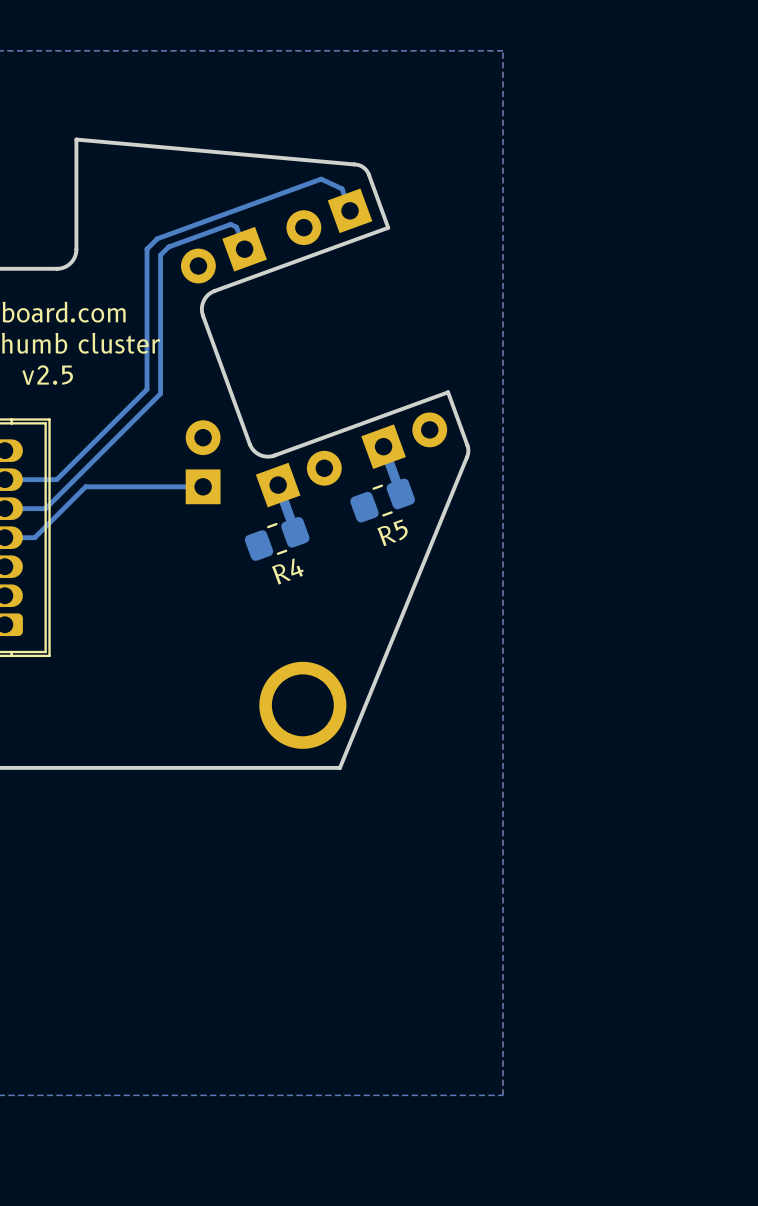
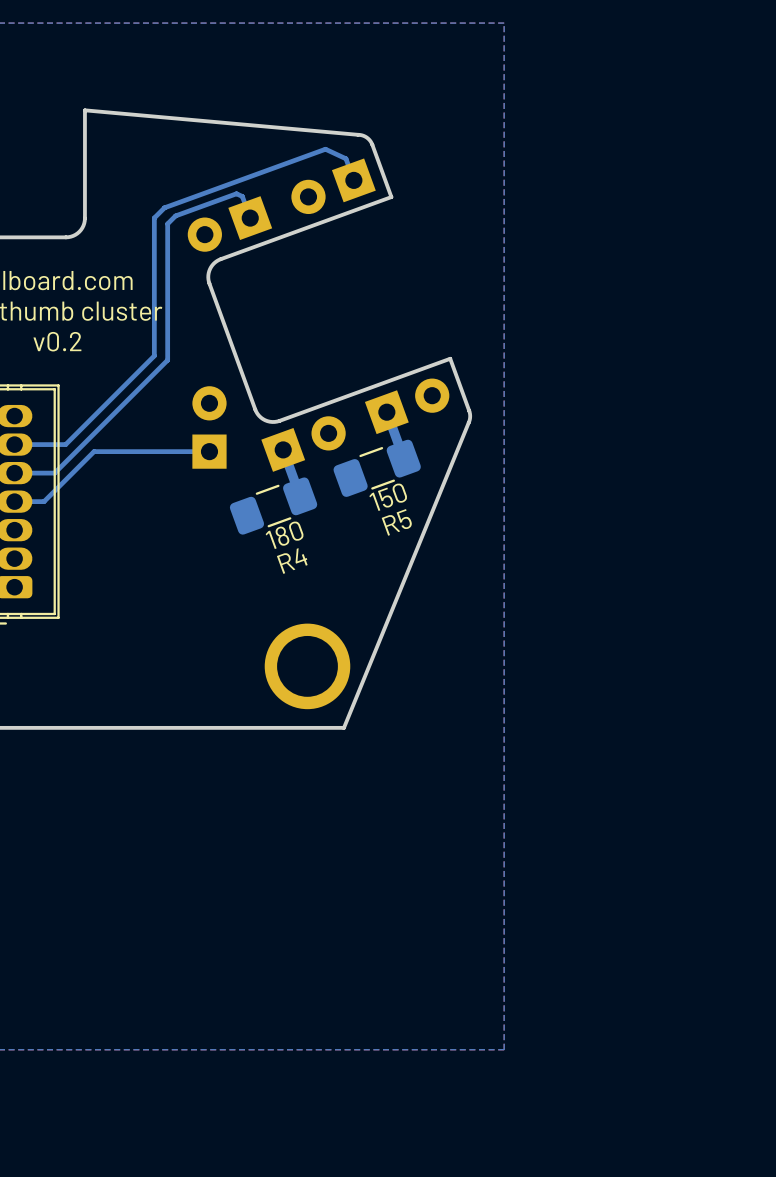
text: v2.5 (47, 375) -> v0.2 (57, 341)
R5 footprint: [350, 478, 415, 523] -> [333, 439, 421, 497]
R4 footprint: [244, 517, 310, 561] -> [229, 477, 318, 535]
R5 value: none -> 150 (388, 497)
R4 value: none -> 180 (284, 535)

